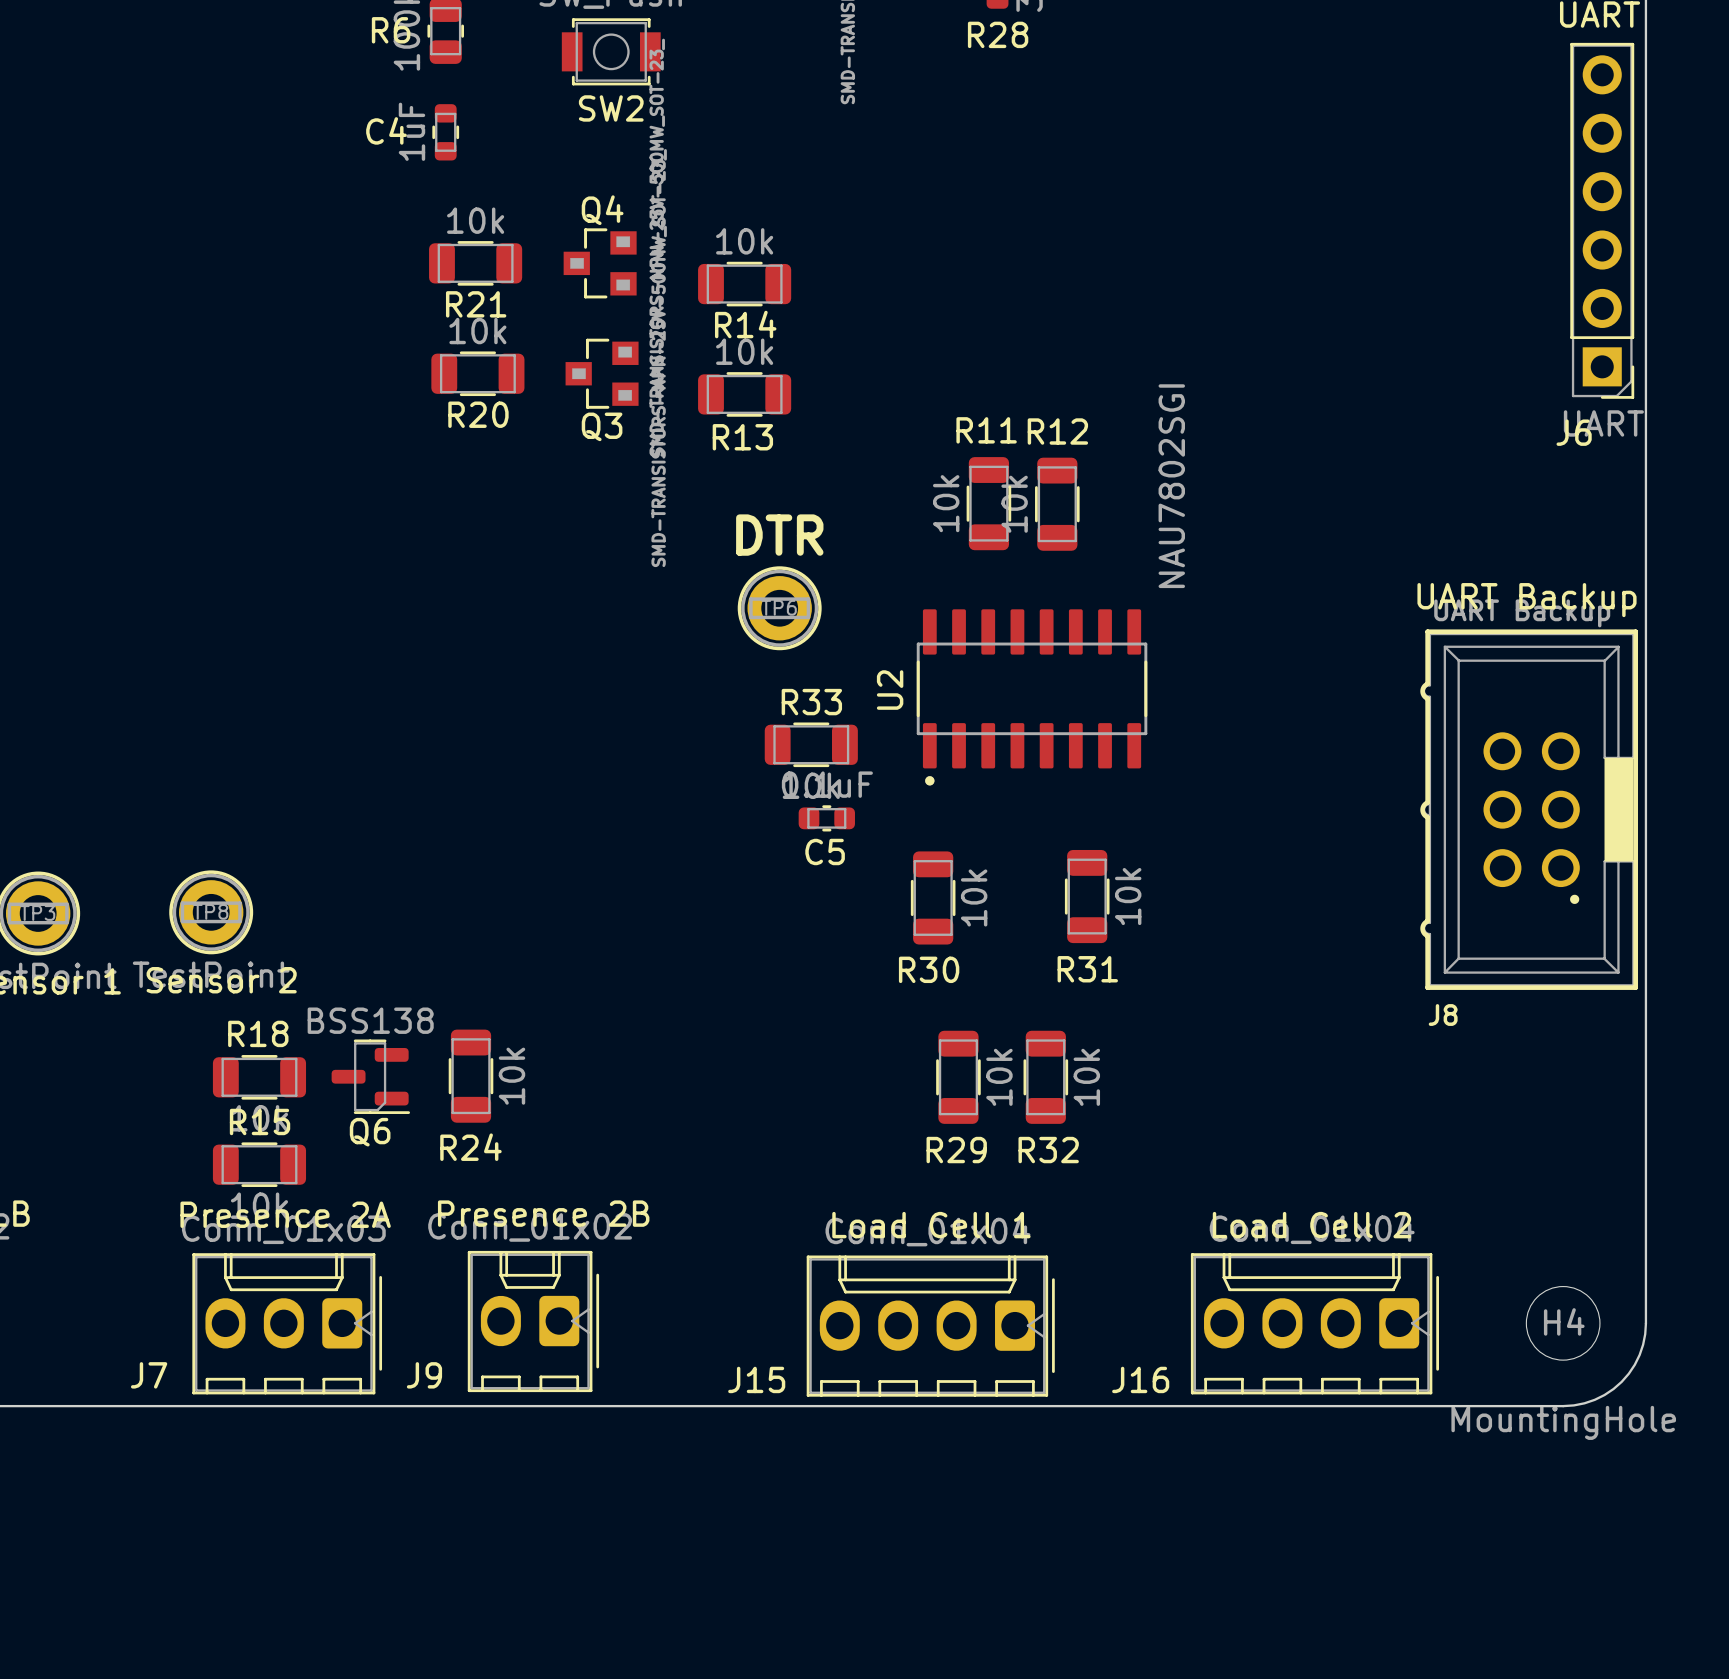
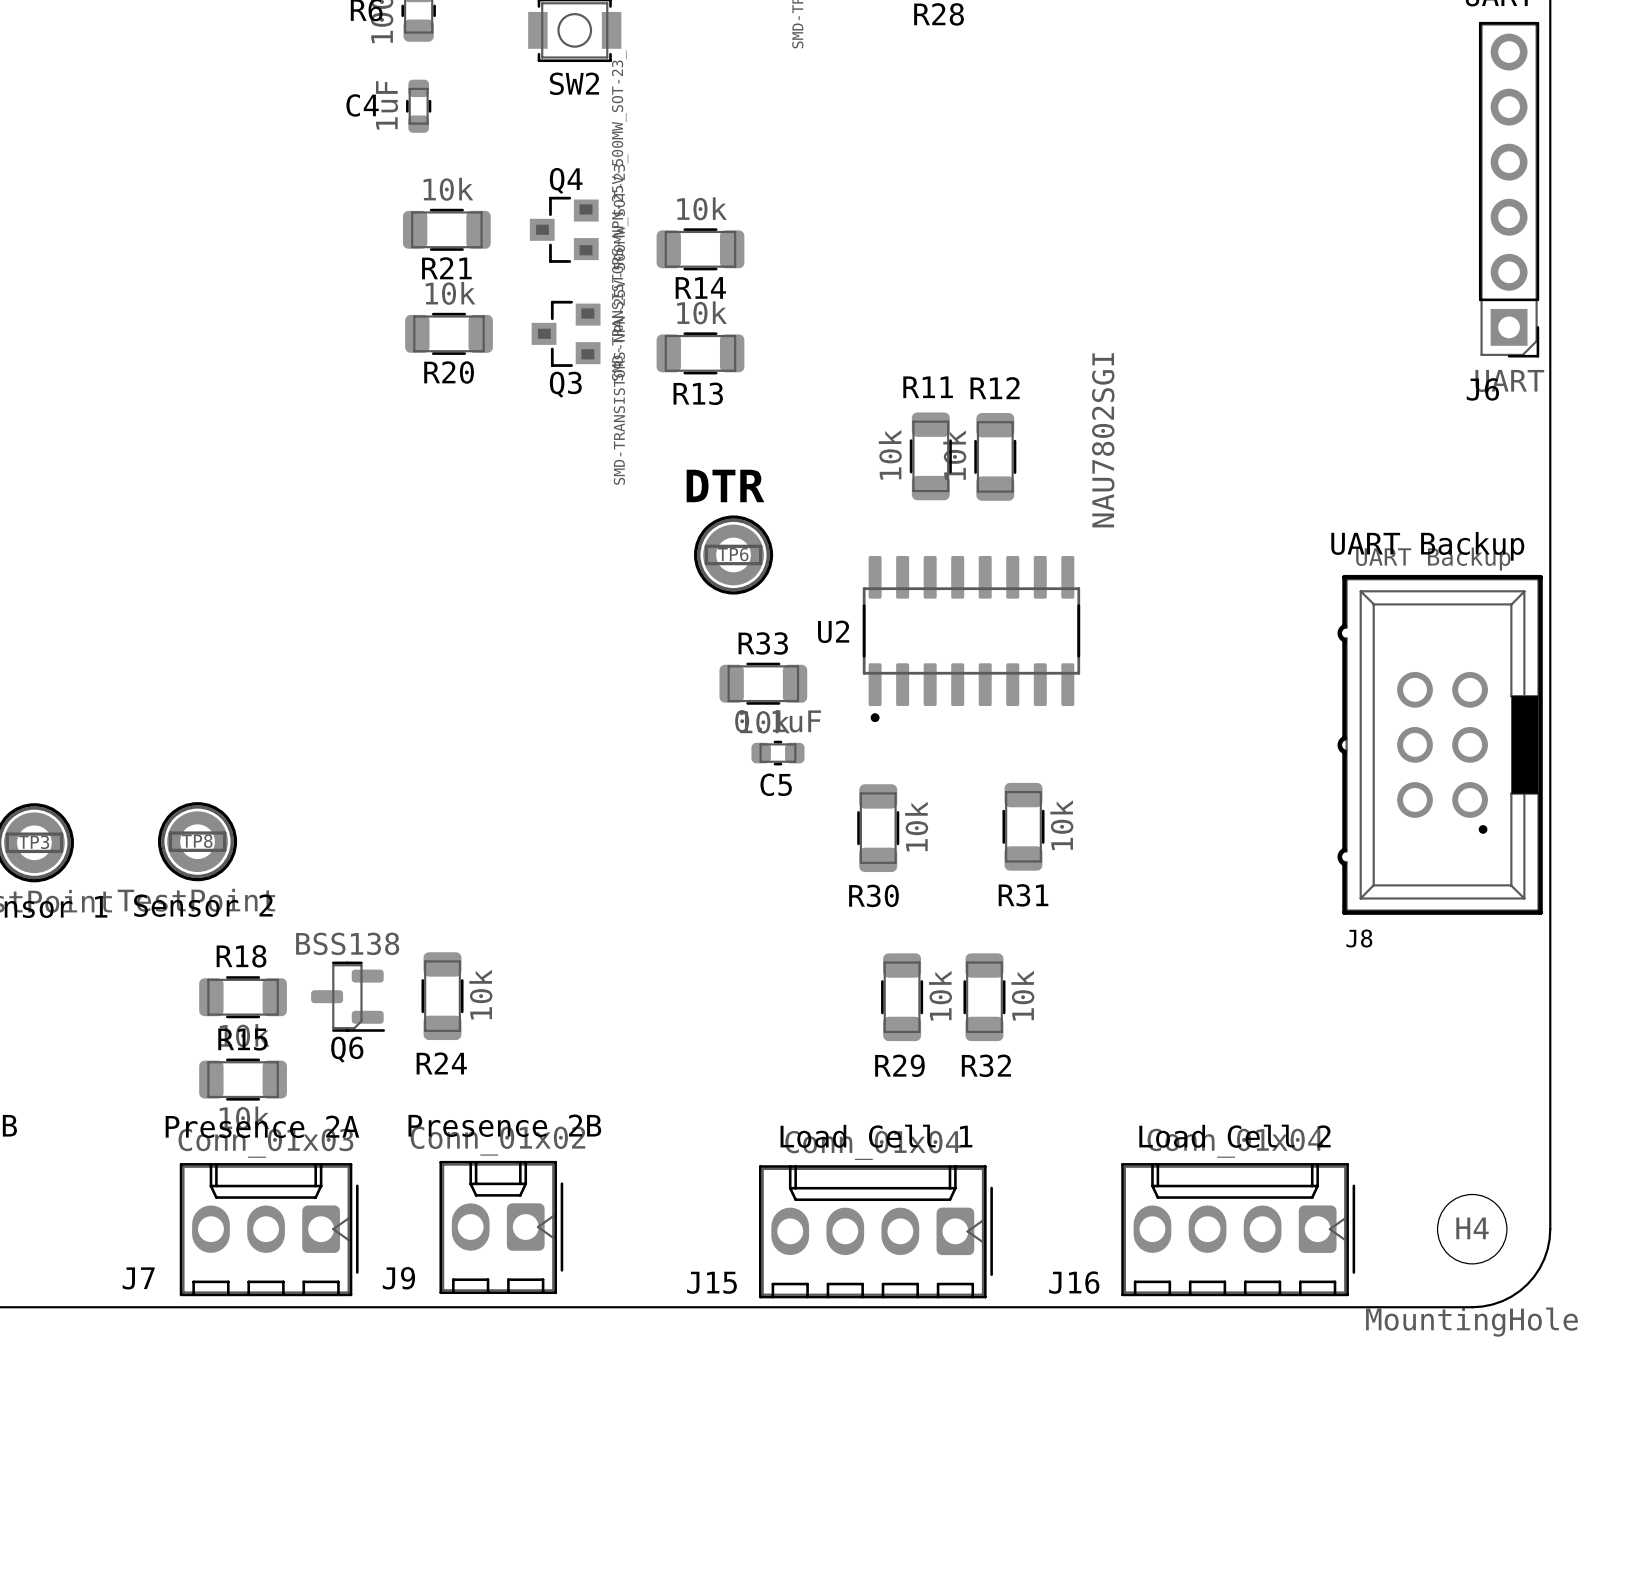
U2 name rotation: 0° (890, 690) -> 90° clockwise (833, 631)

